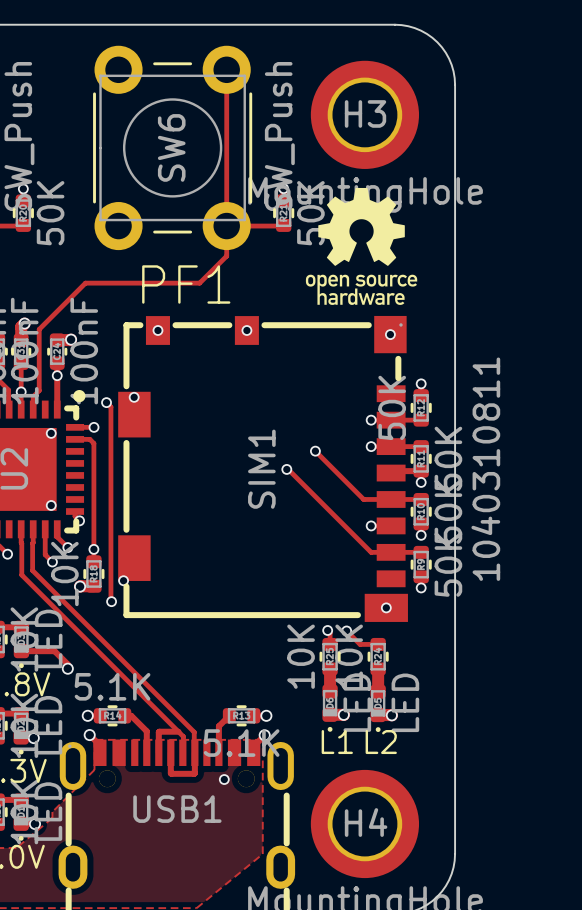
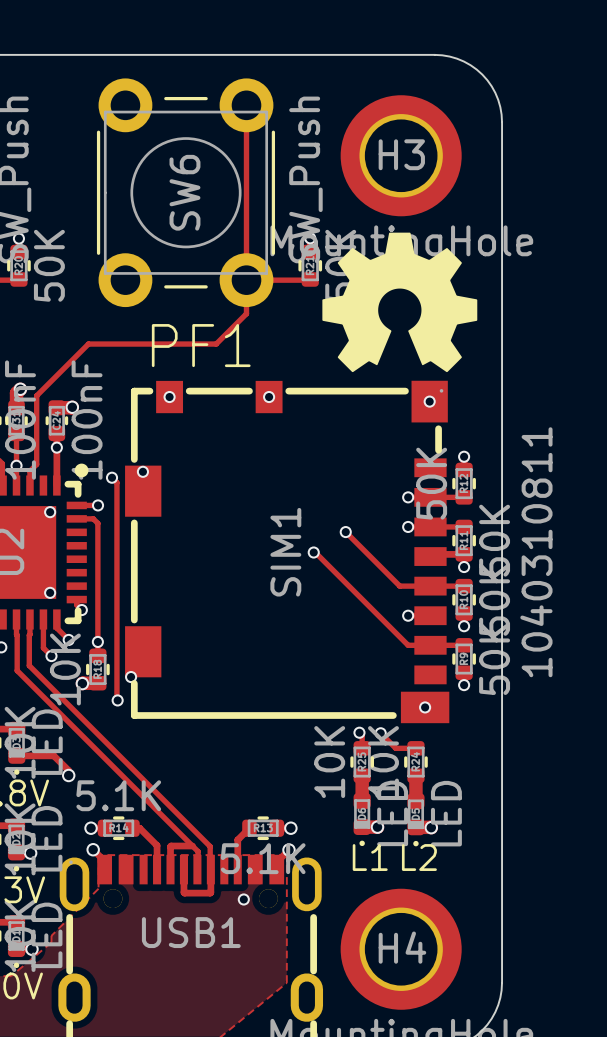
drawing: none -> [322, 232, 478, 373]
drawing: [305, 187, 418, 305] -> none

